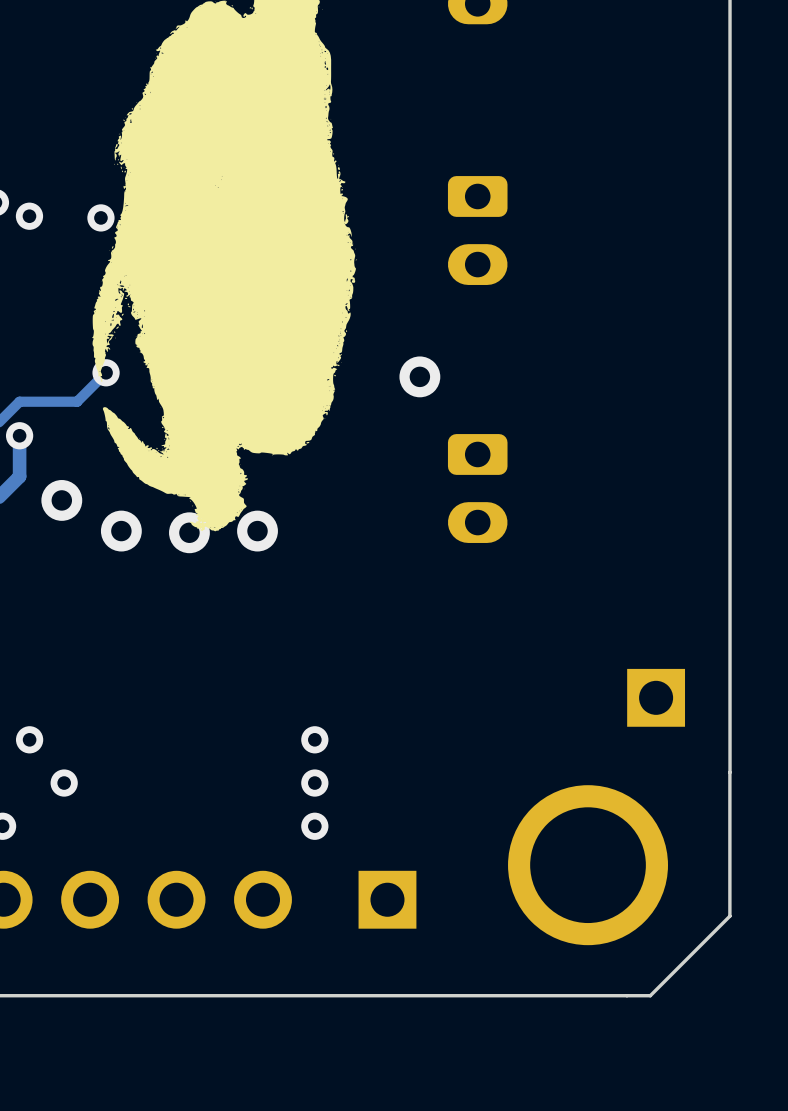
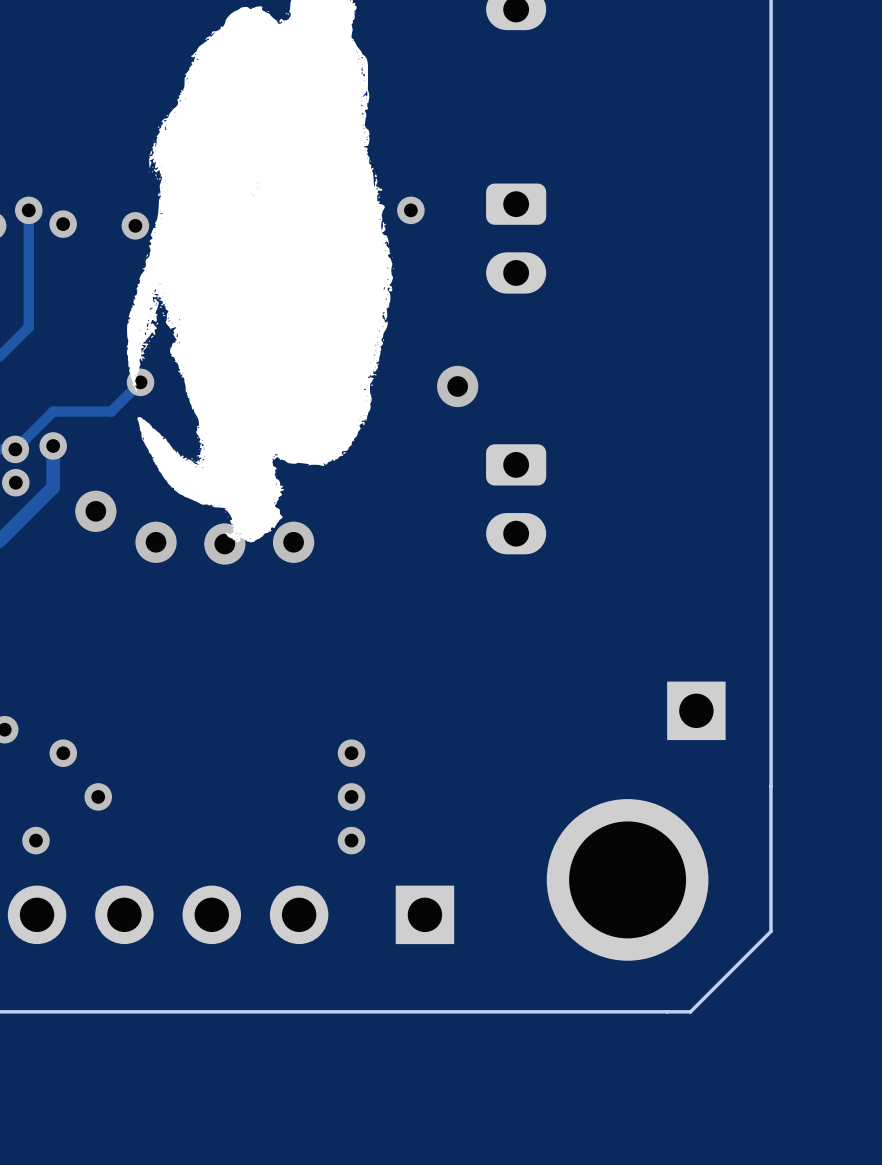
via: none -> (410, 210)

